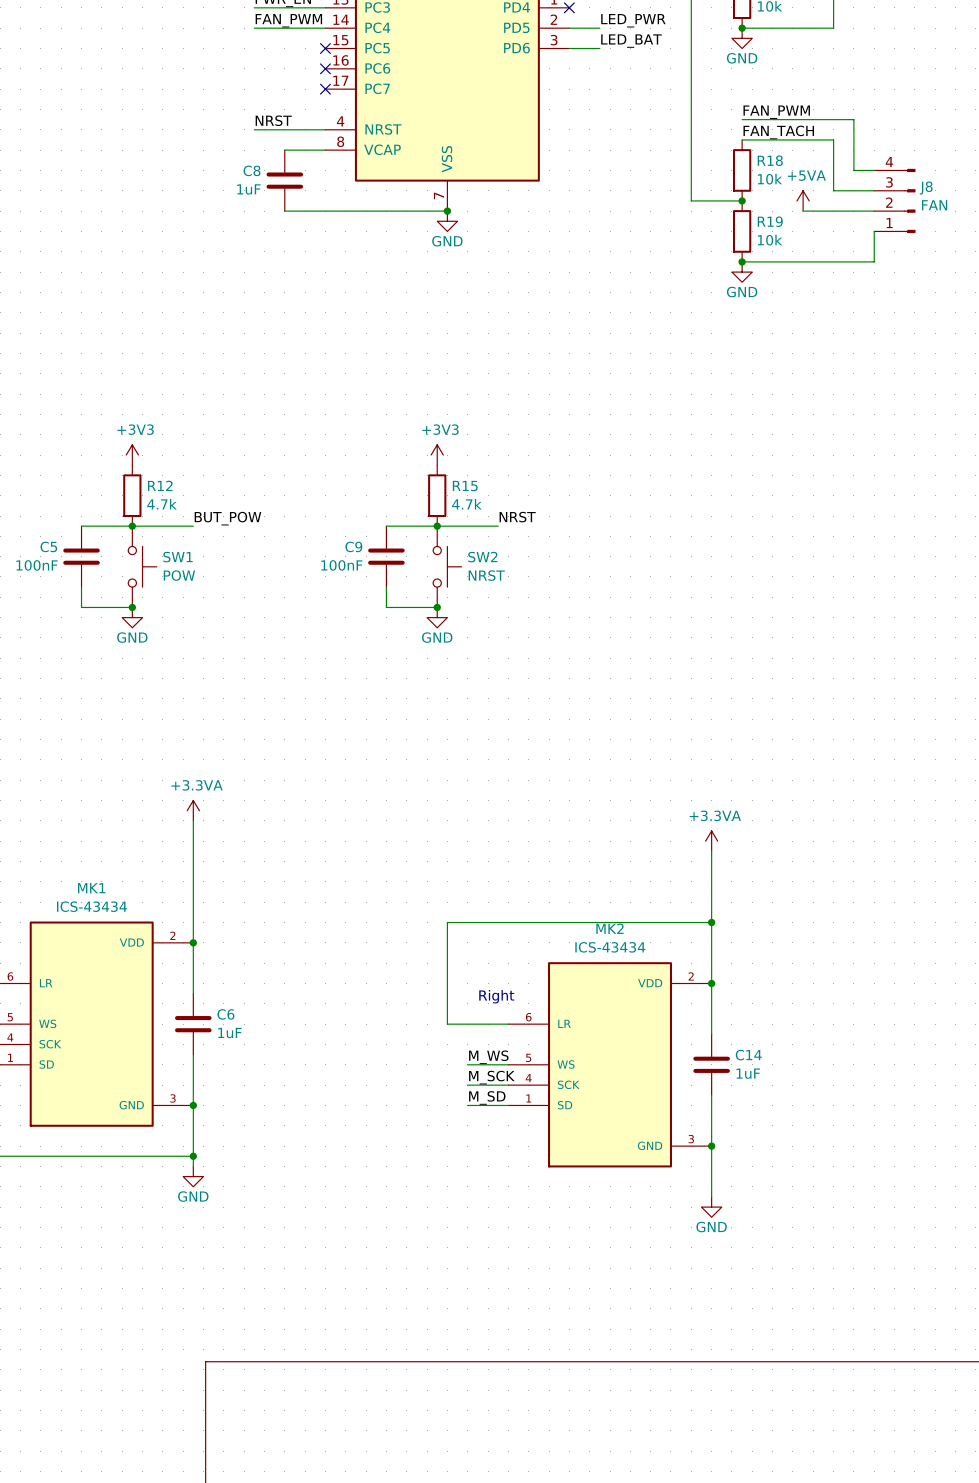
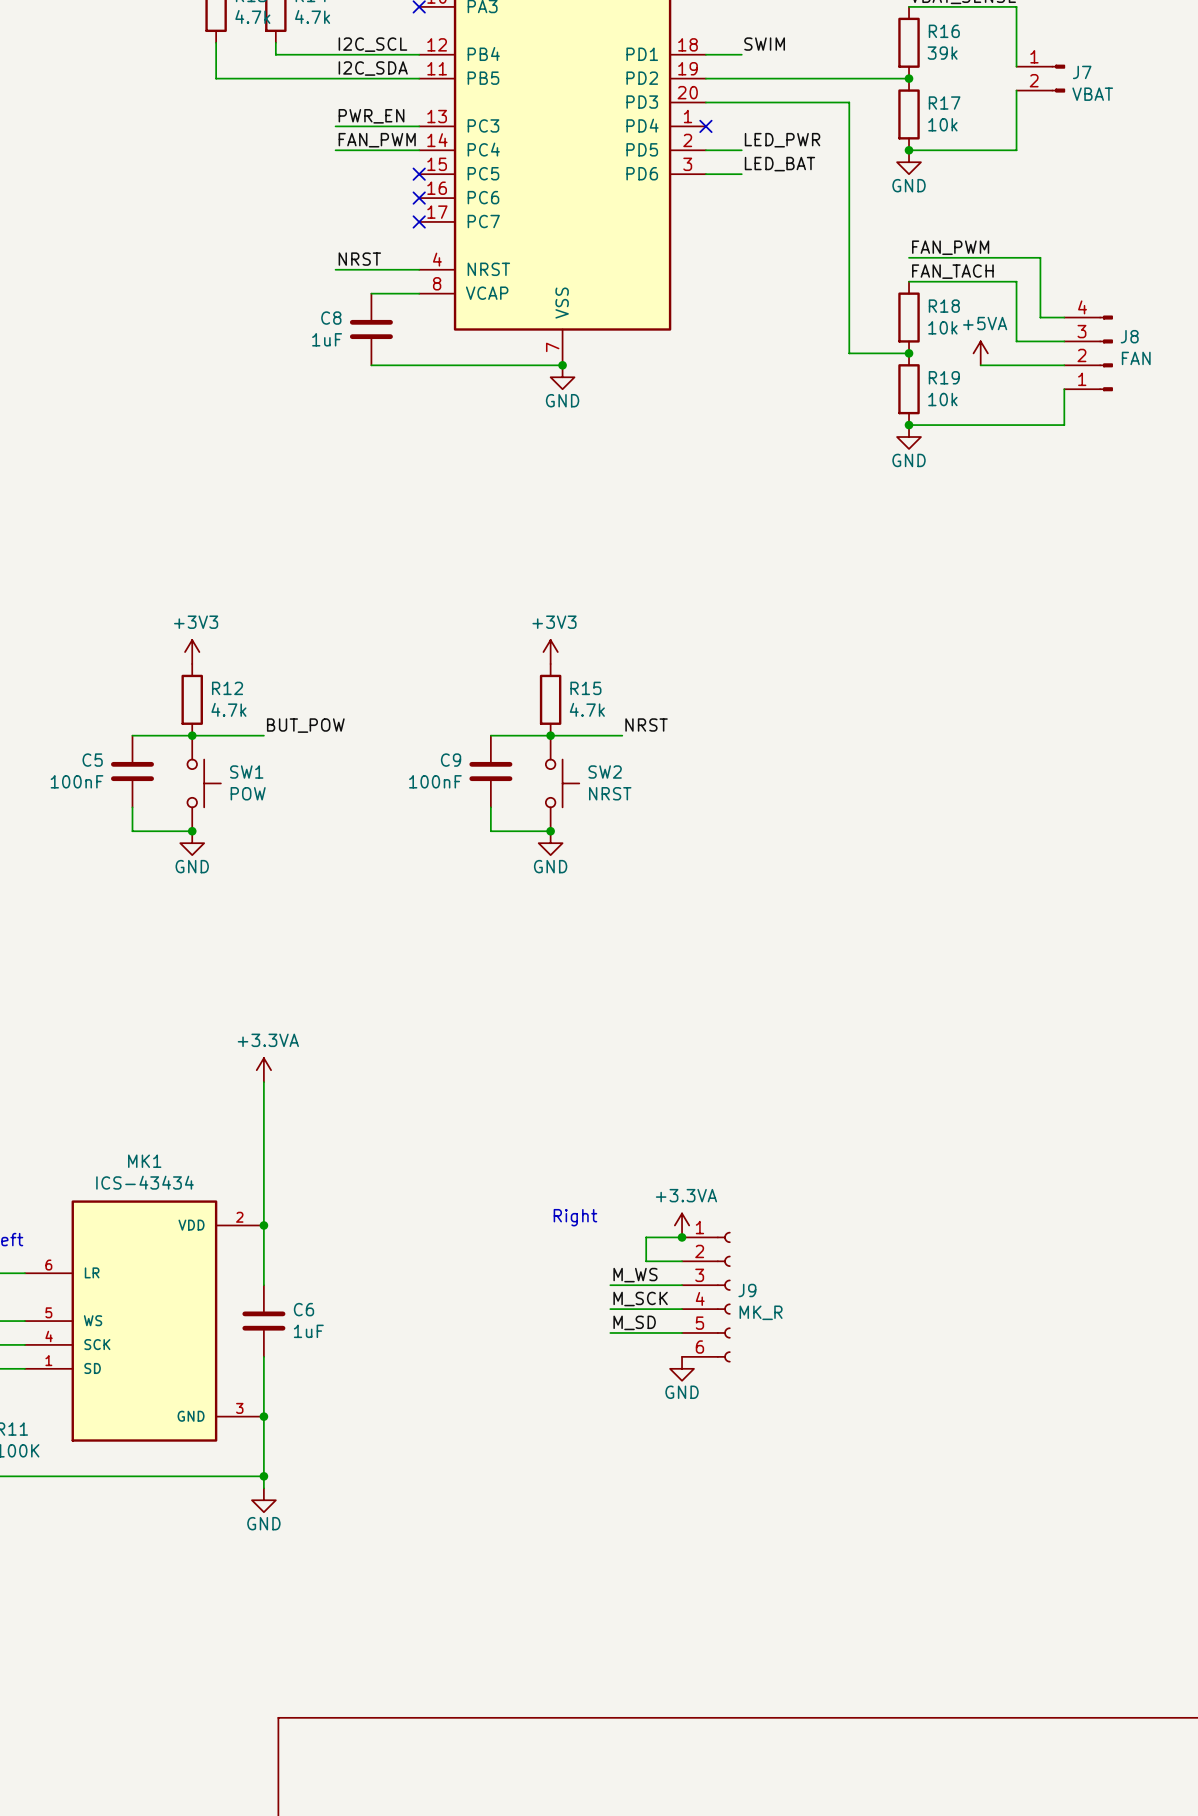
power symbol position: +3.3VA (711, 841) -> +3.3VA (682, 1225)
wire: (711, 851) (711, 1034) -> none
wire: (711, 922) (447, 922) (447, 1024) (508, 1024) -> none
junction: (711, 922) -> none
wire: none -> (682, 1237) (646, 1237) (646, 1261) (682, 1261)
junction: none -> (682, 1237)
junction: (711, 983) -> none
wire: none -> (610, 1285) (682, 1285)
text position: Right (496, 996) -> Right (575, 1217)
J9: none -> MK_R (706, 1297)
wire: none -> (610, 1309) (682, 1309)
wire: none -> (610, 1332) (682, 1332)
label position: M_WS (488, 1057) -> M_WS (635, 1275)
wire: (467, 1064) (508, 1064) -> none
power symbol: none -> GND (682, 1368)
MK2: ICS-43434 (610, 1064) -> none
C14: 1uF (711, 1064) -> none
label position: M_SCK (491, 1077) -> M_SCK (640, 1299)
wire: (467, 1085) (508, 1085) -> none
wire: (711, 1095) (711, 1196) -> none
label position: M_SD (487, 1097) -> M_SD (634, 1322)
wire: (467, 1105) (508, 1105) -> none
junction: (711, 1146) -> none
power symbol: GND (711, 1207) -> none

